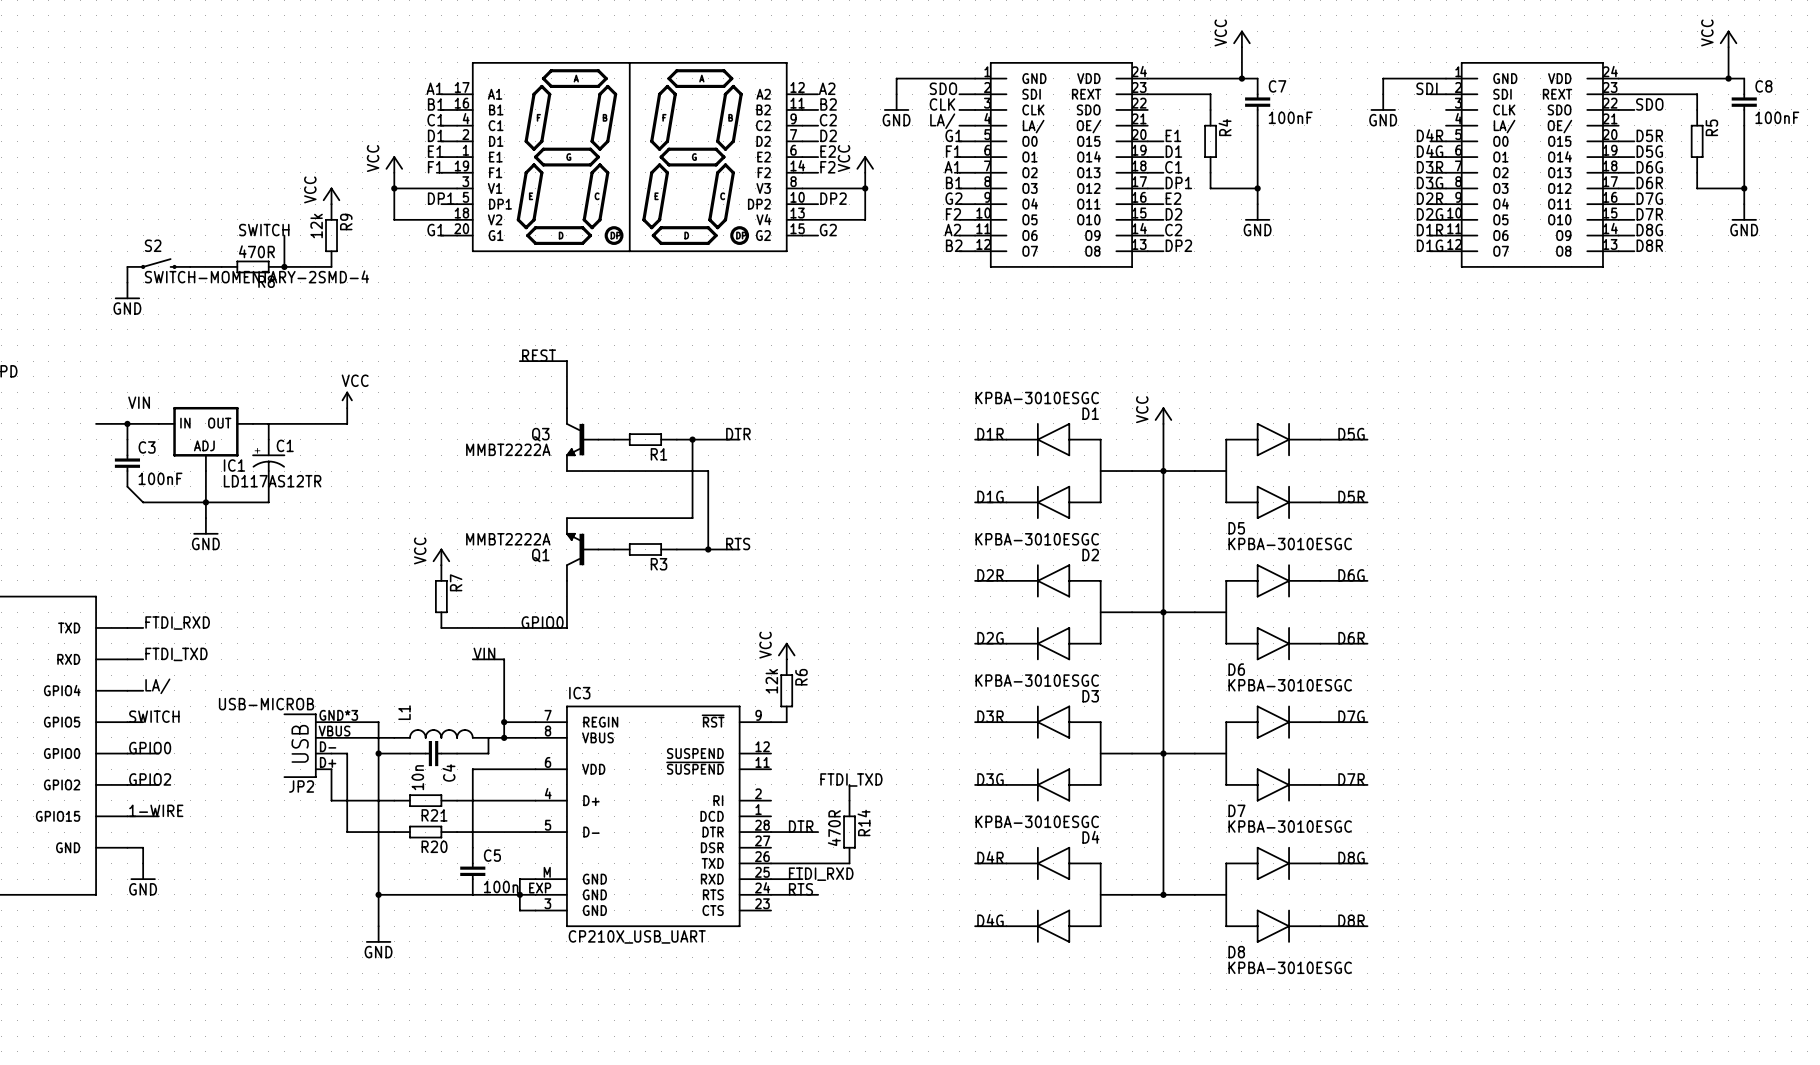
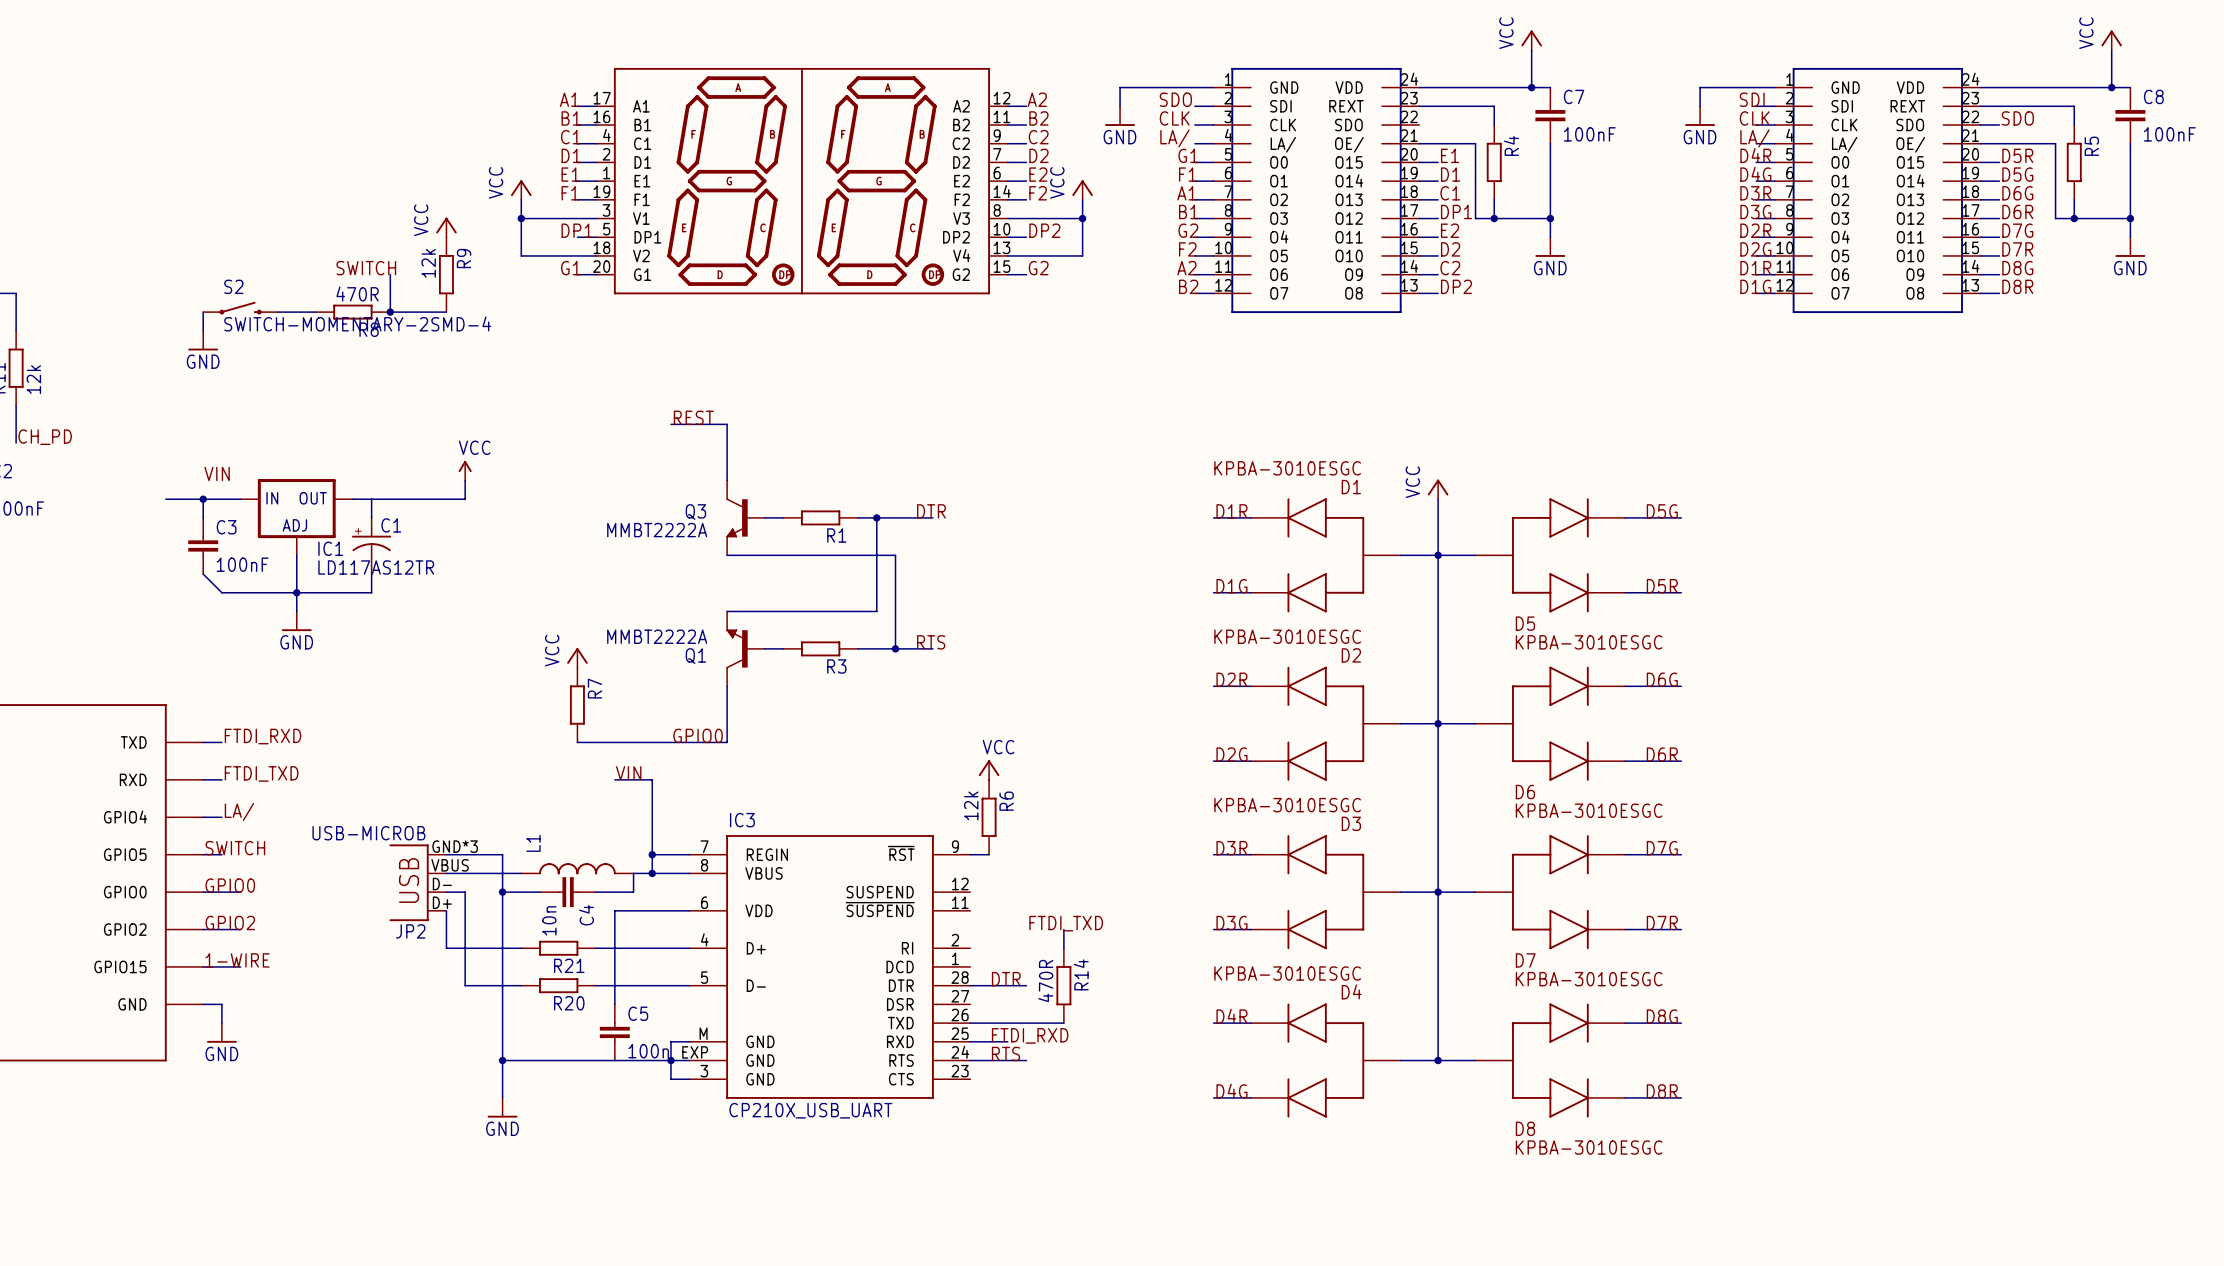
label: none -> CLK (1754, 118)
wire: none -> (1756, 125) (1774, 125)
label: none -> LA/ (1755, 138)
wire: none -> (1419, 143) (1475, 143) (1475, 218) (1494, 218)
wire: none -> (1756, 143) (1774, 143)
wire: none -> (1980, 143) (2055, 143) (2055, 218) (2074, 218)
junction: none -> (1494, 218)
junction: none -> (2074, 218)
power symbol text rotation: 0° (765, 645) -> 90° clockwise (998, 747)

